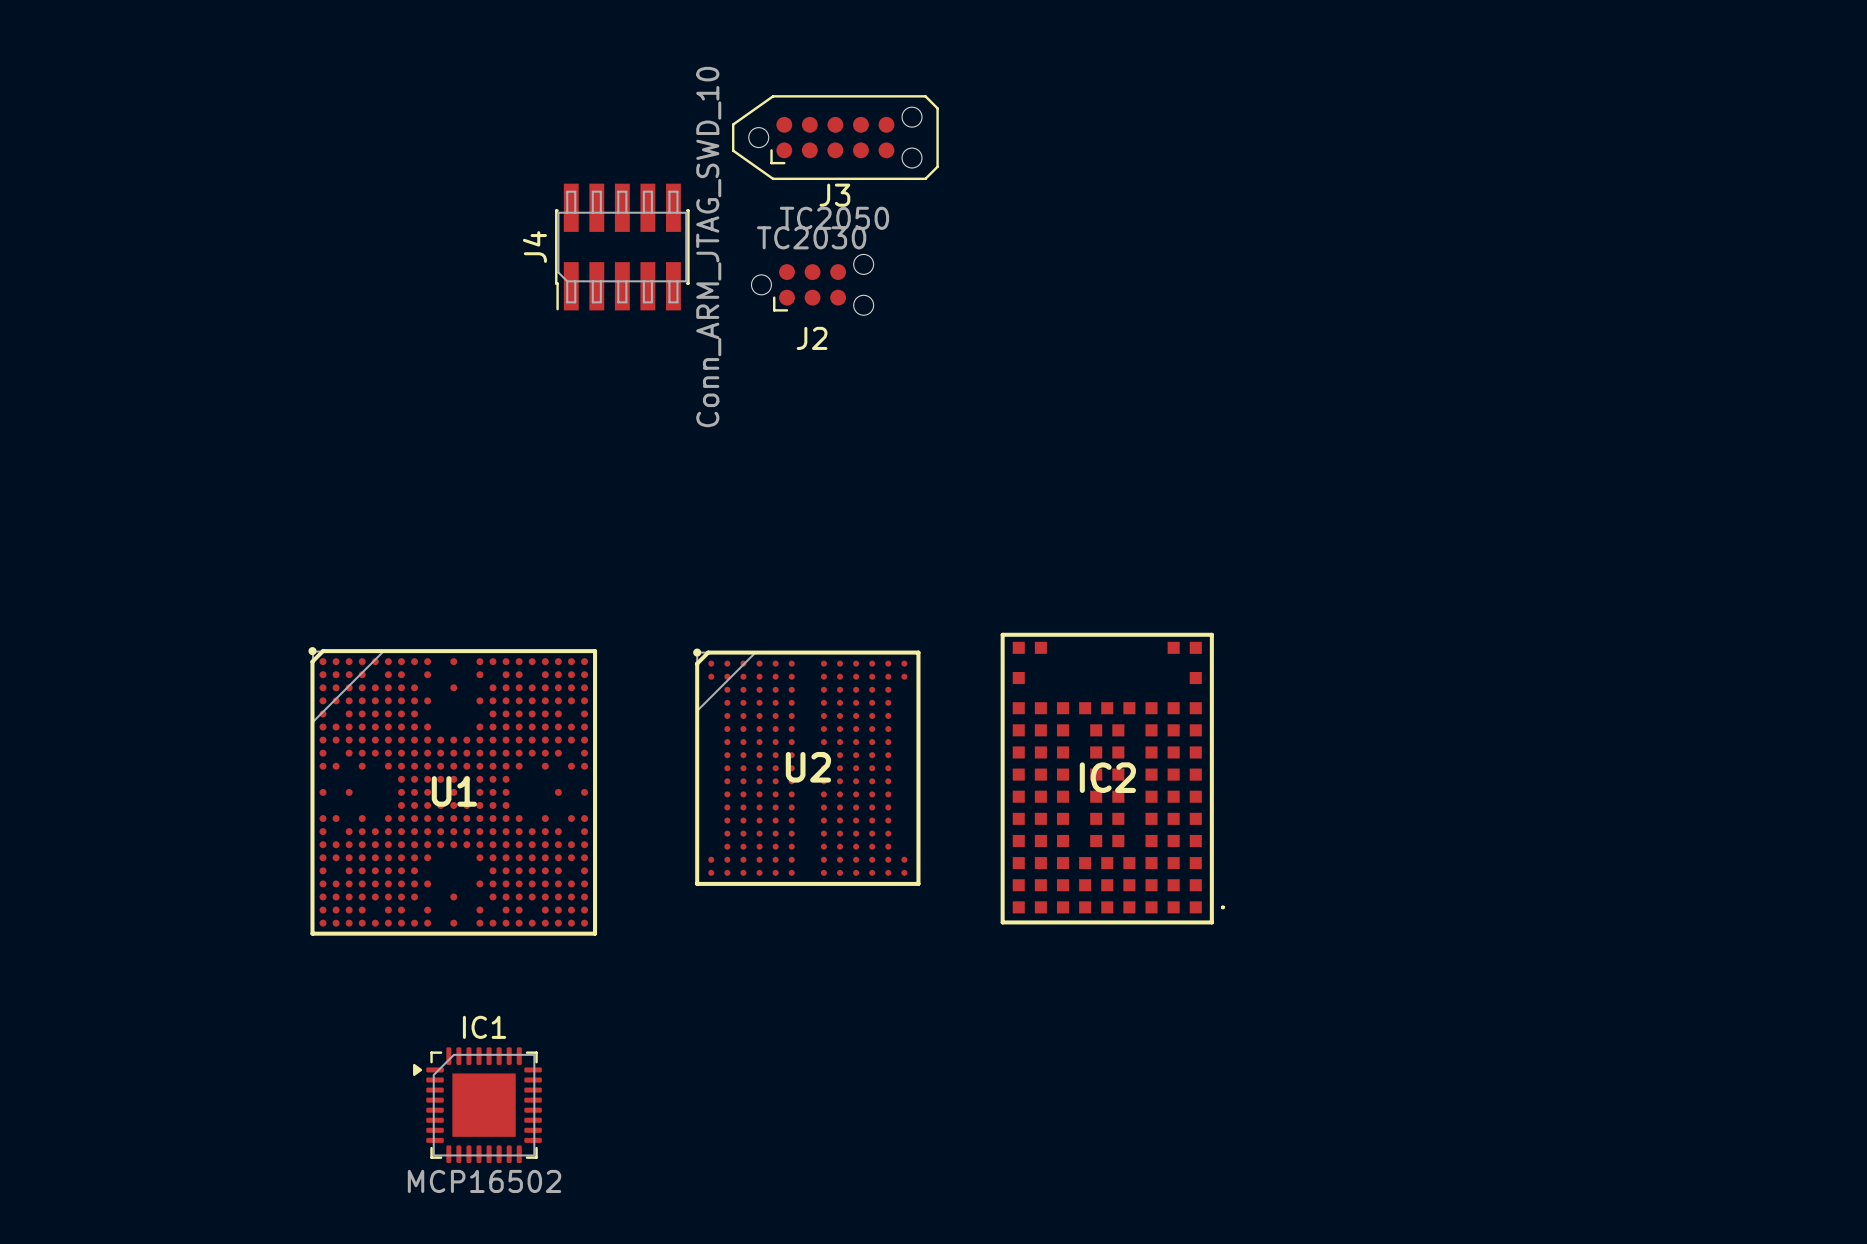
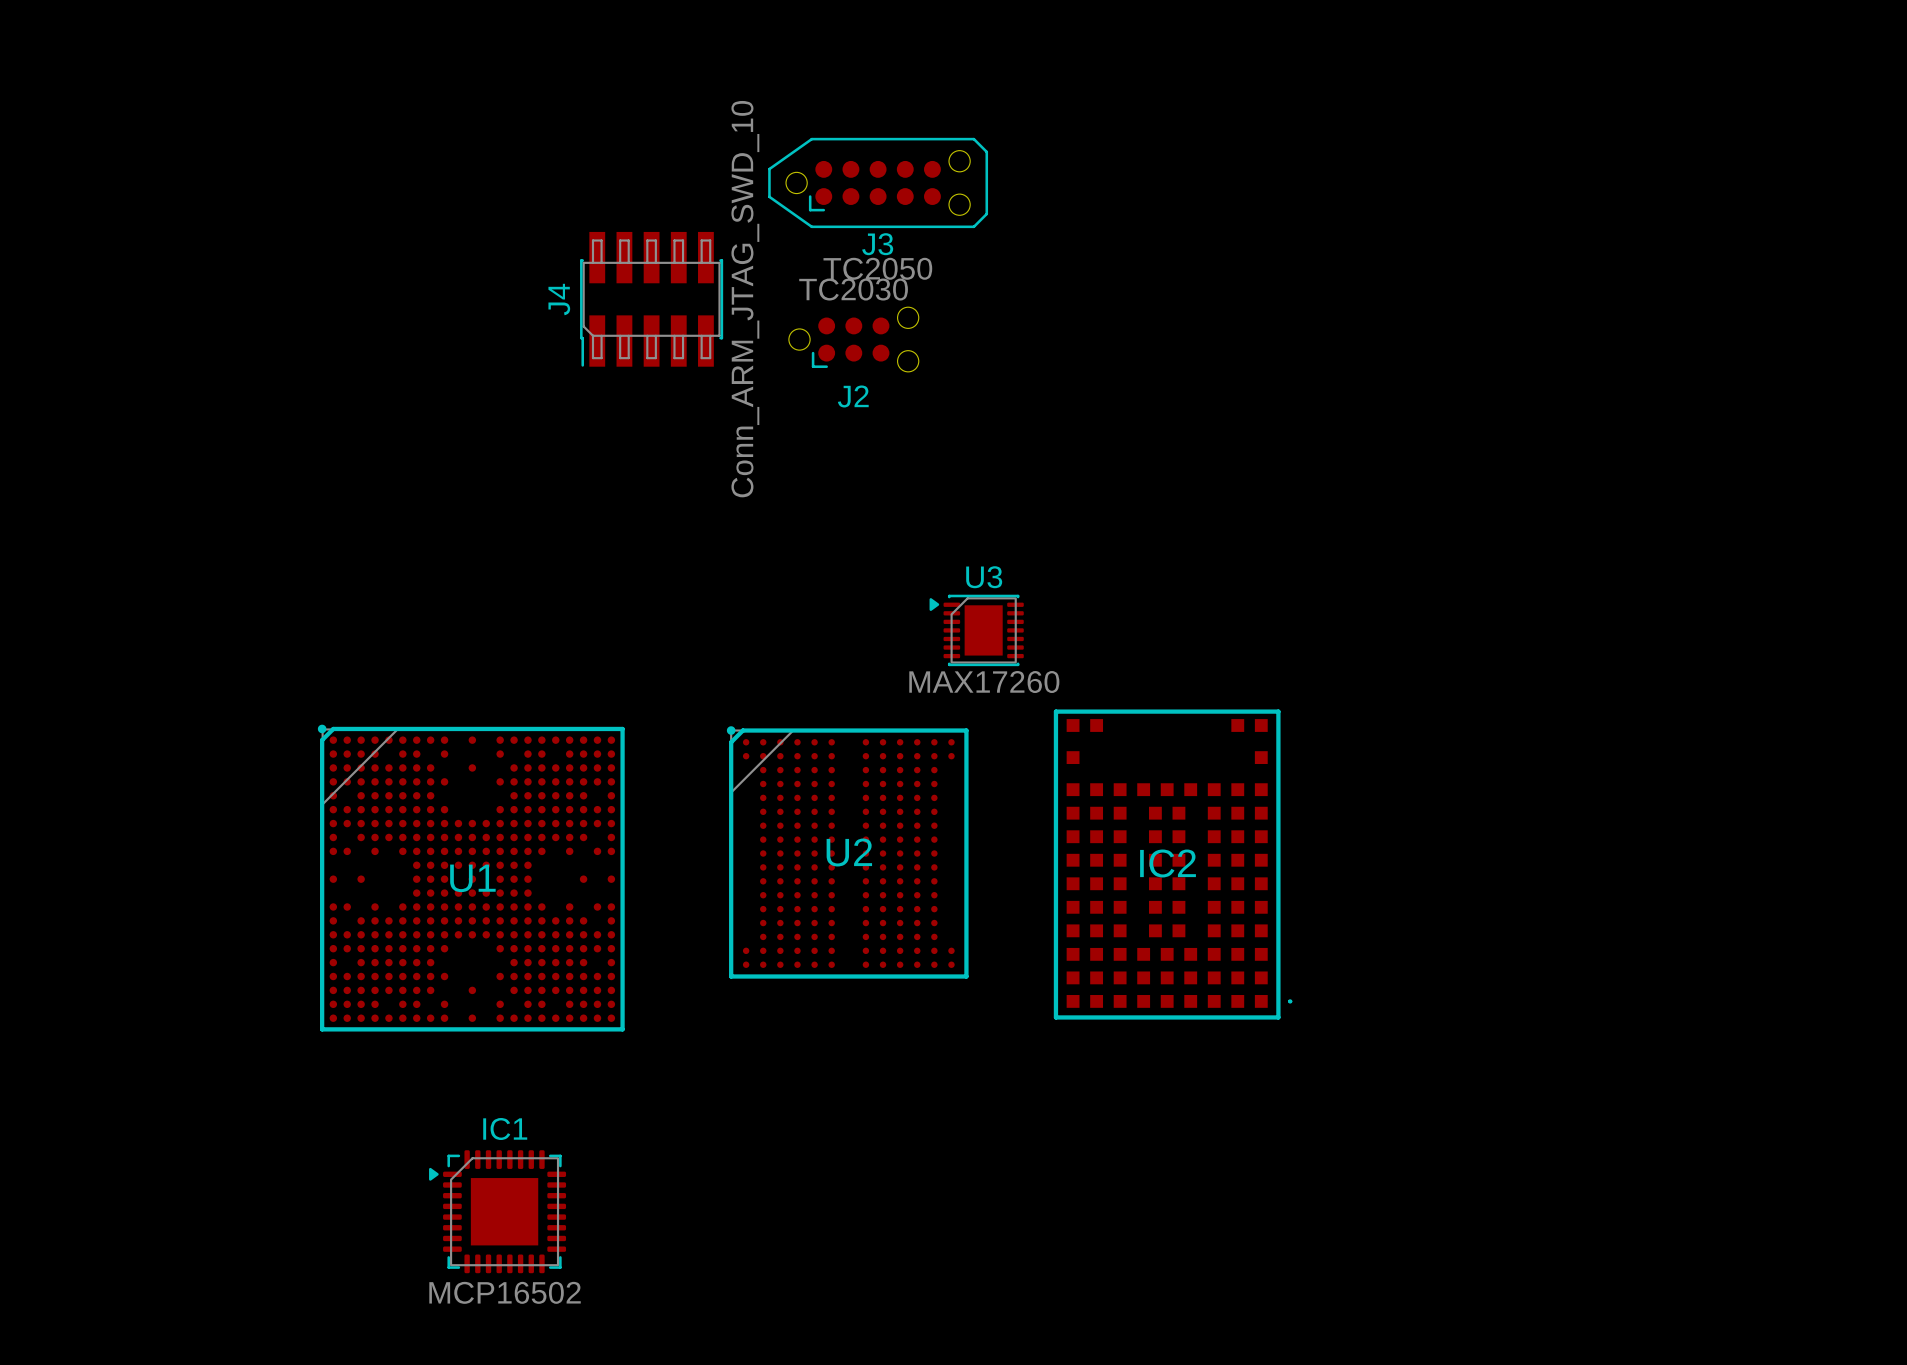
U3: none -> MAX17260 (976, 630)

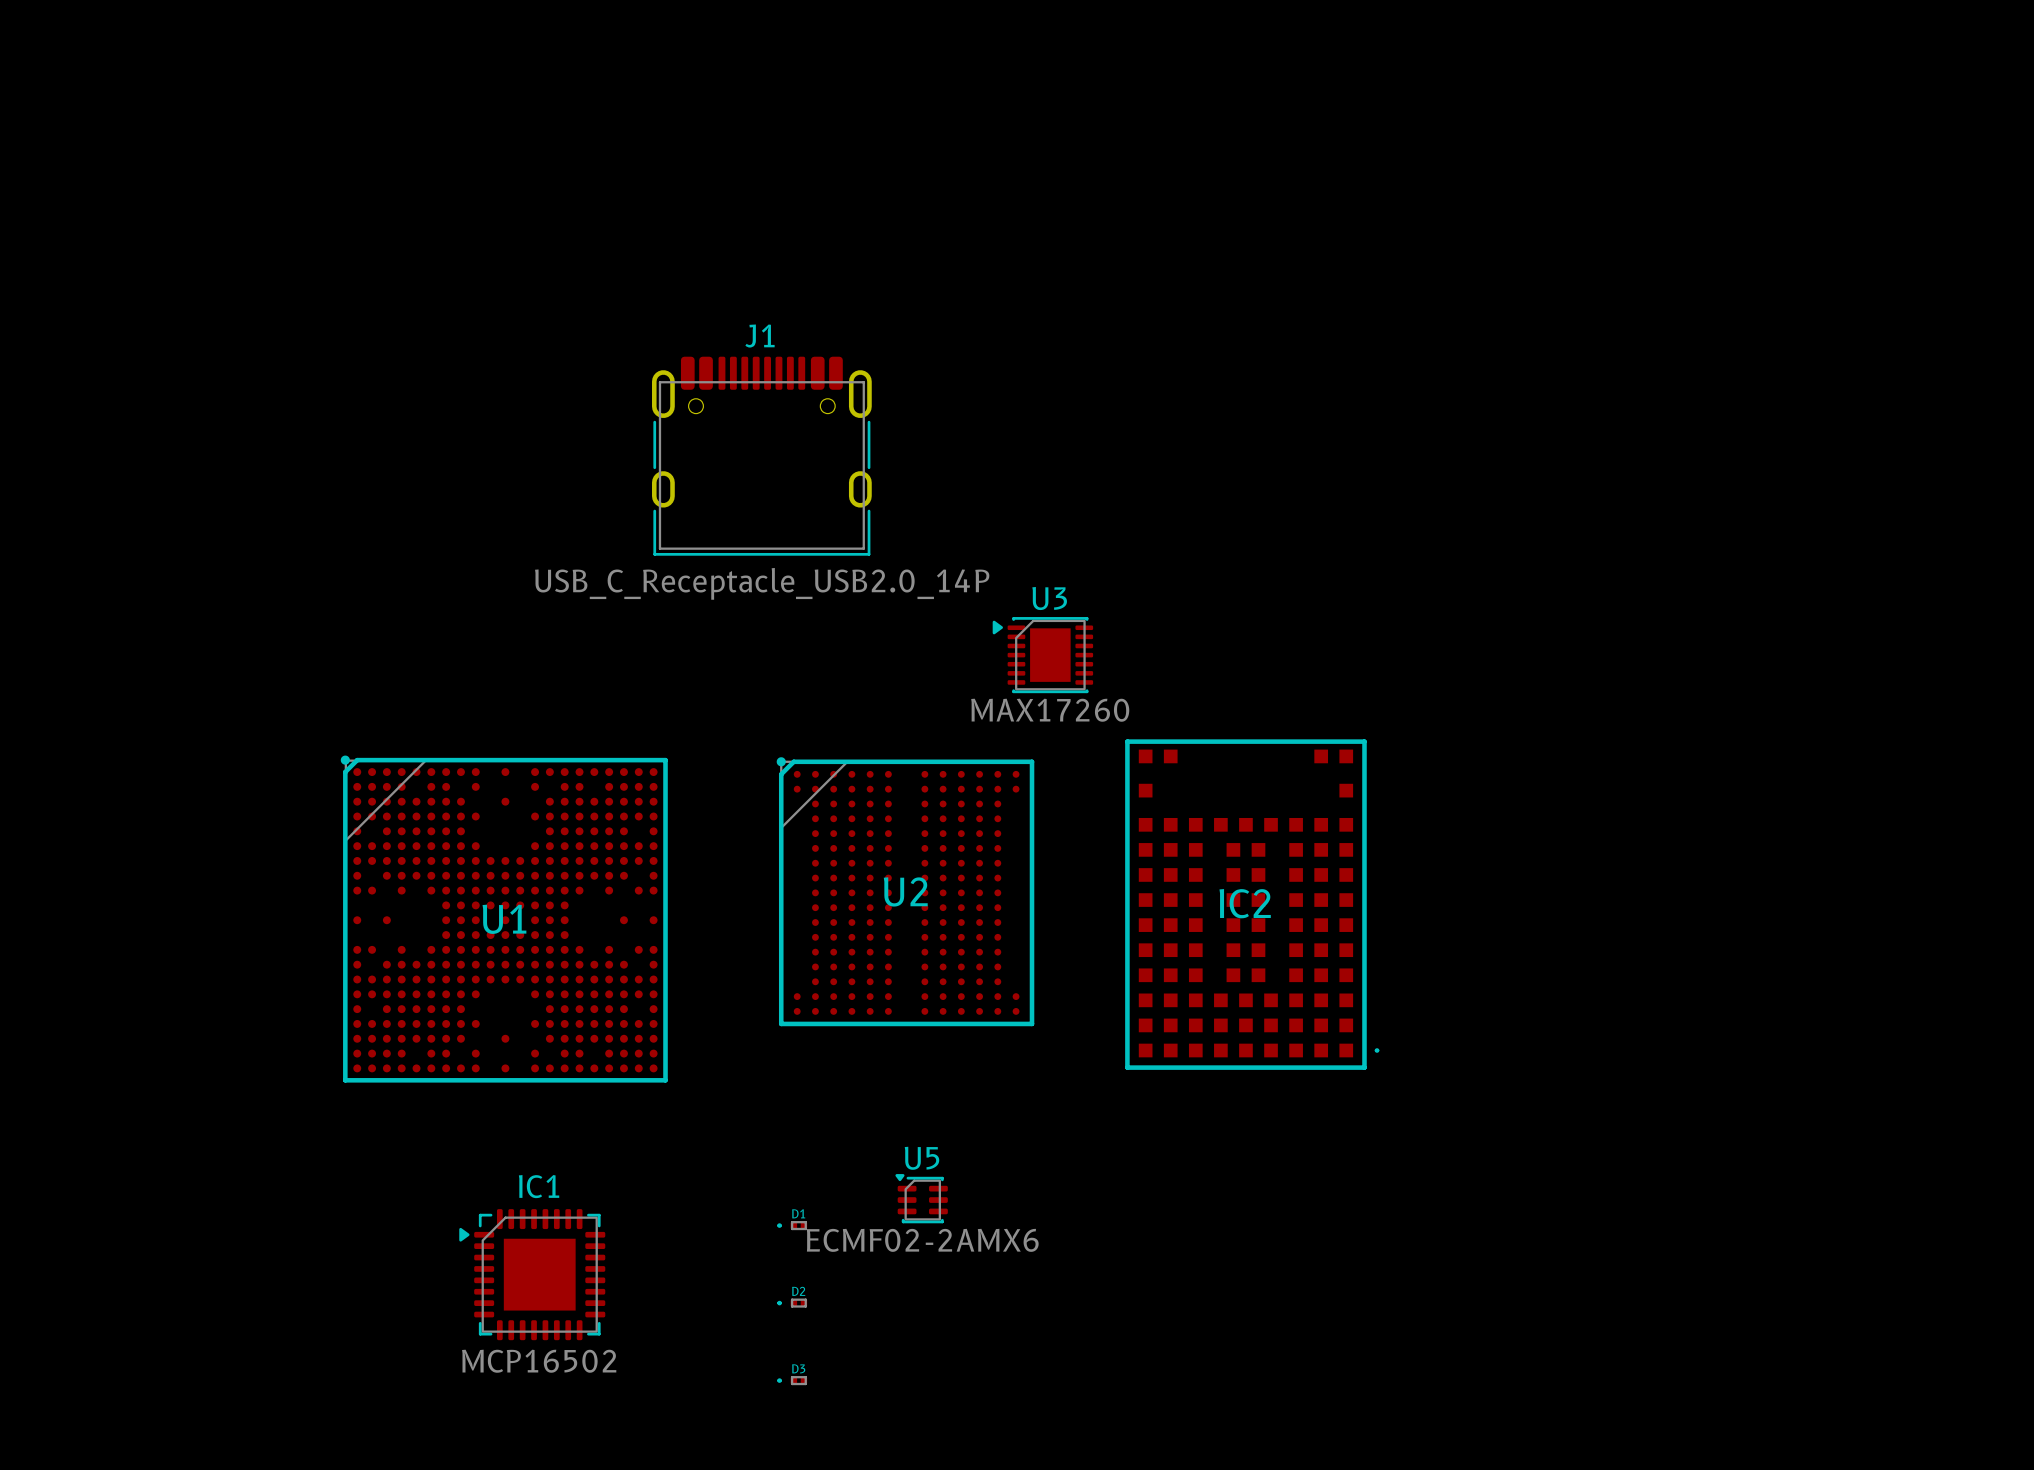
J3: TC2050 (878, 182) -> none
J4: Conn_ARM_JTAG_SWD_10 (651, 299) -> none
J2: TC2030 (853, 339) -> none
J1: none -> USB_C_Receptacle_USB2.0_14P (761, 456)
U5: none -> ECMF02-2AMX6 (921, 1198)
D1: none -> (792, 1225)
D2: none -> (792, 1303)
D3: none -> (792, 1380)

